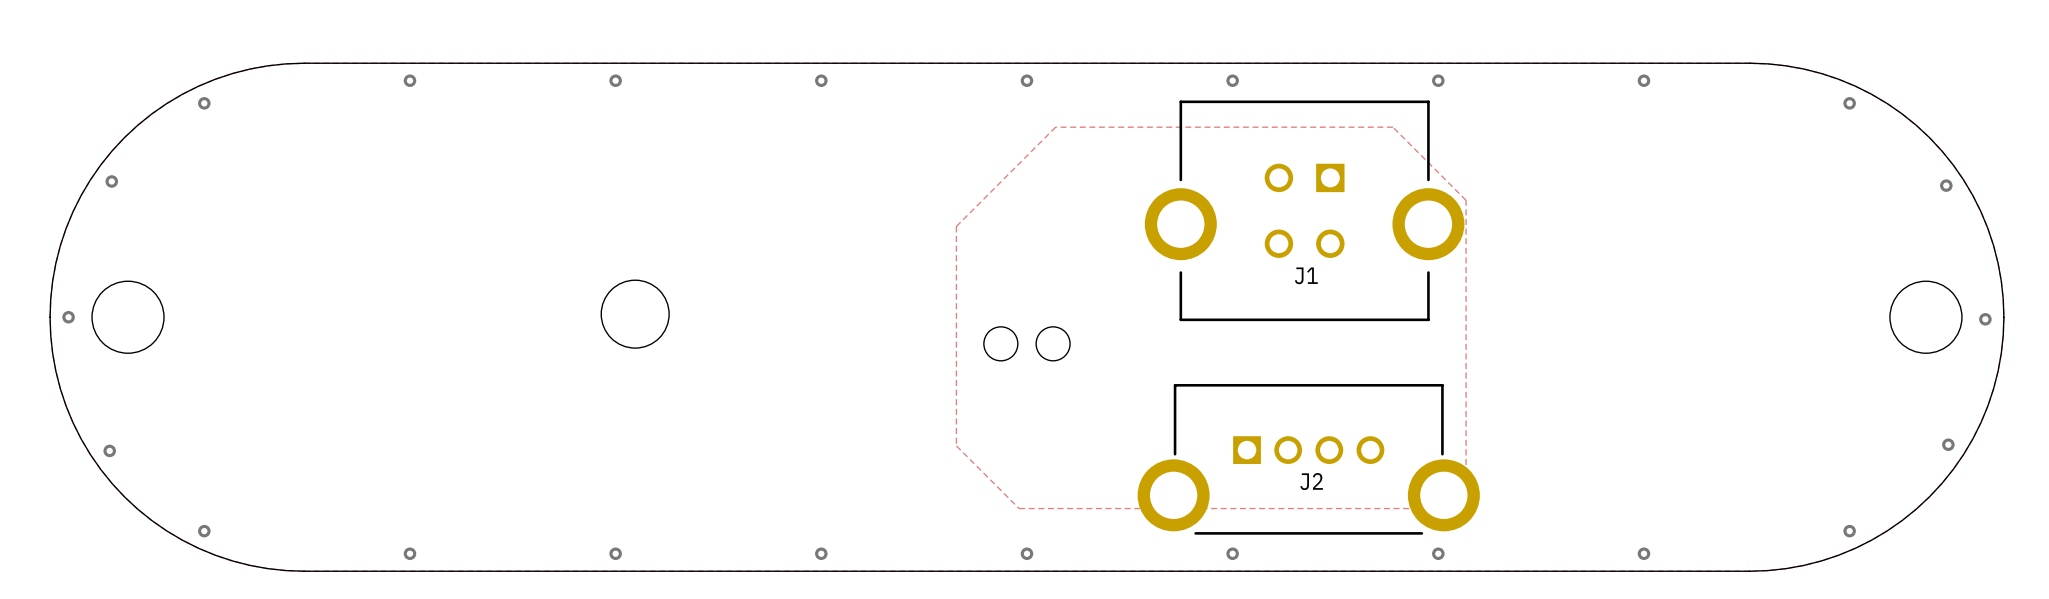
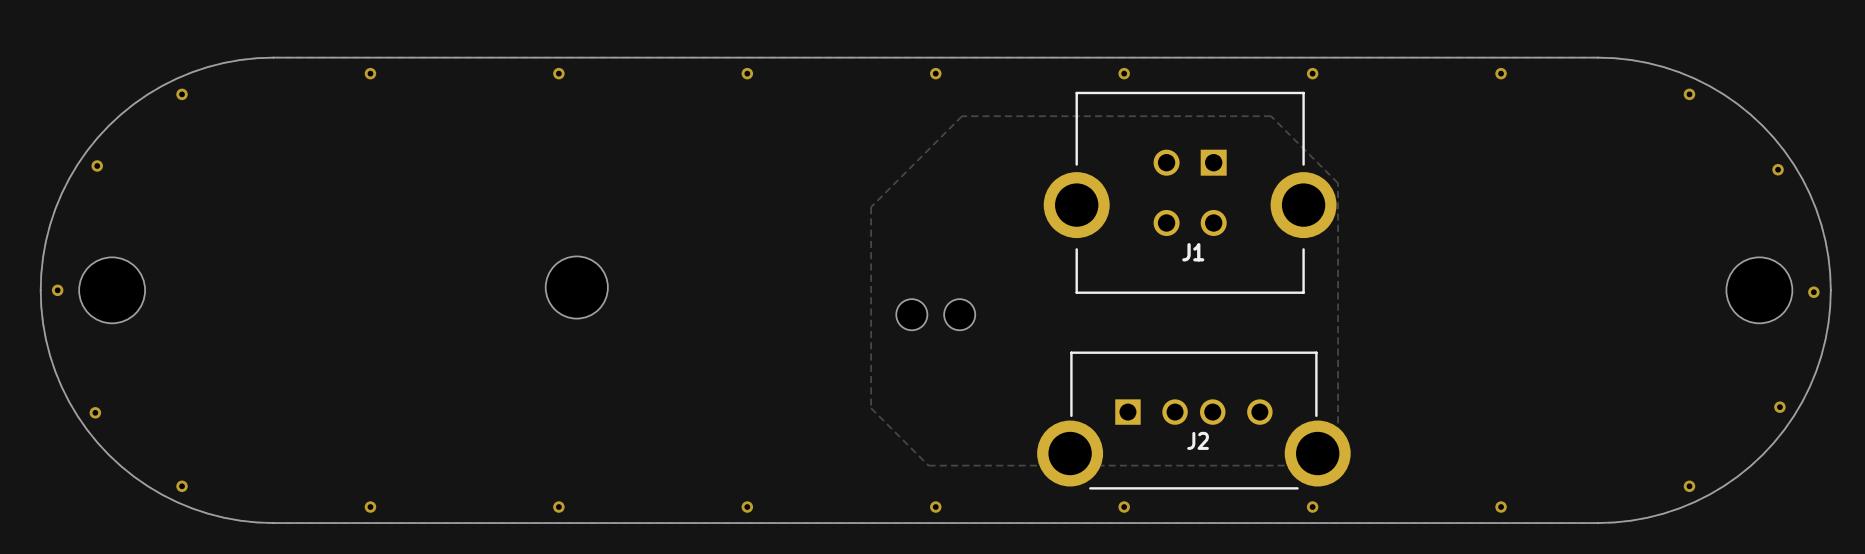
J2 footprint: [1137, 384, 1480, 535] -> [1037, 351, 1351, 490]

